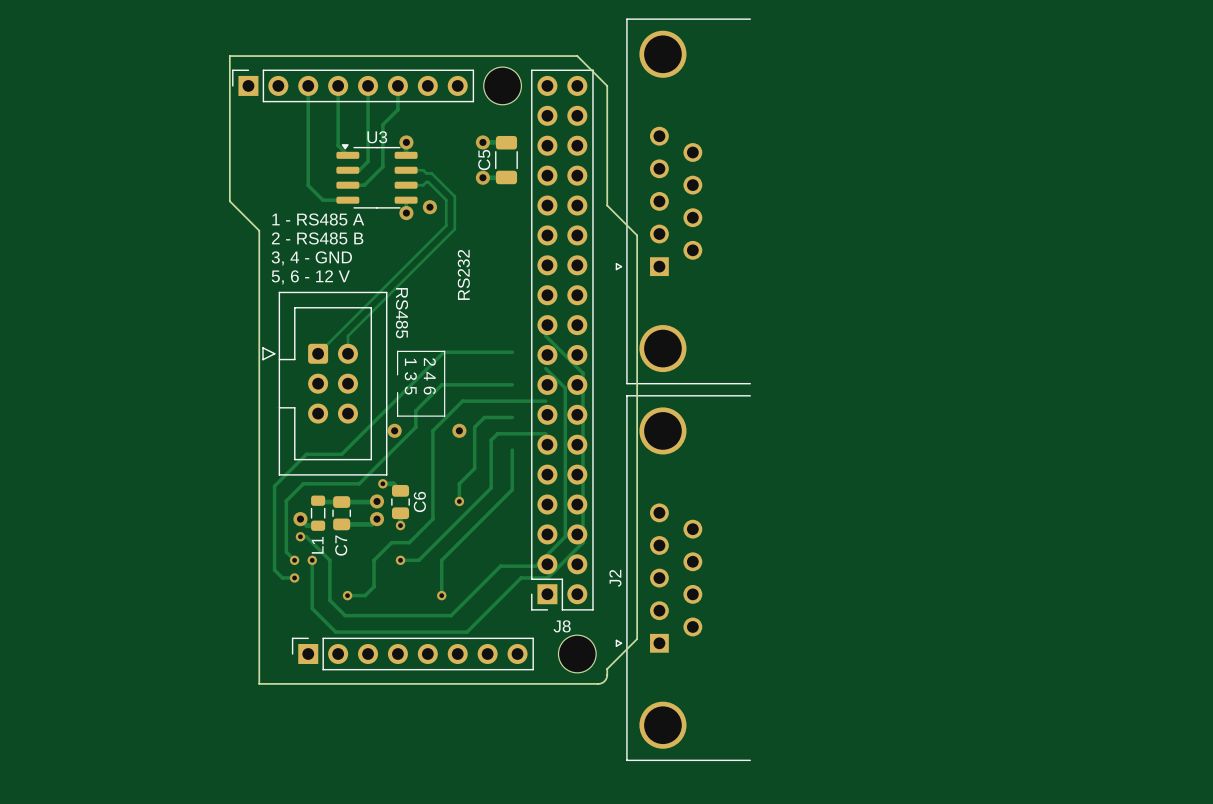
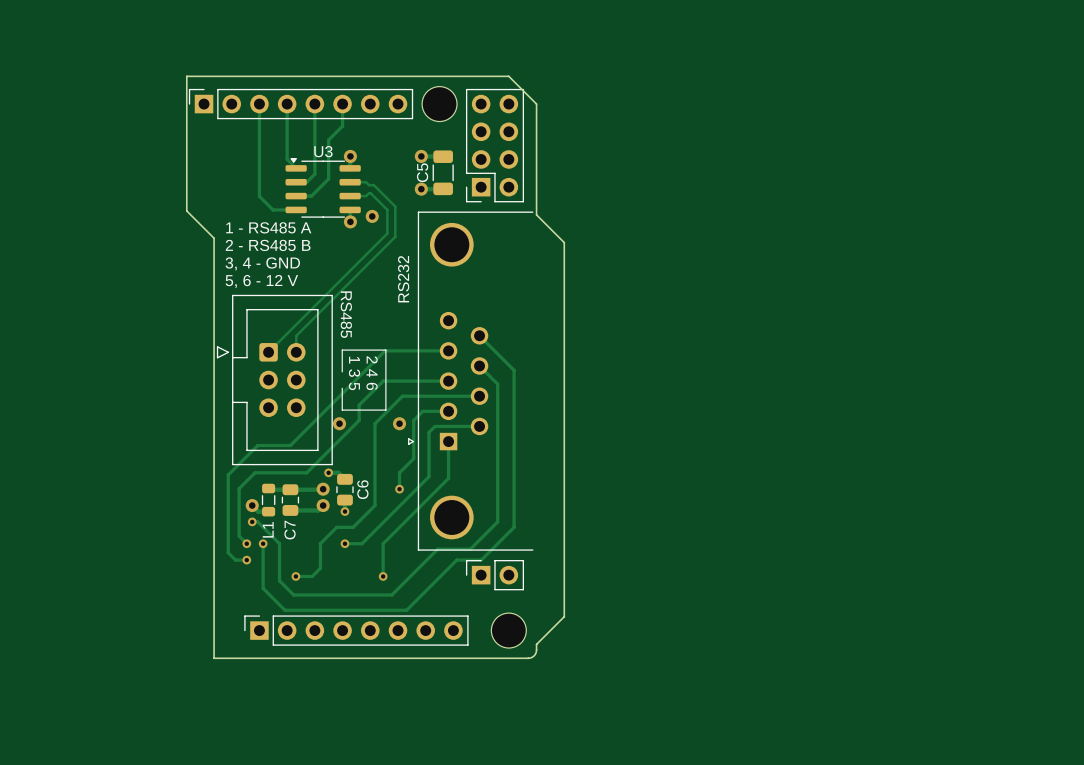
part: none -> (494, 145)
part position: (683, 201) -> (470, 381)
J8: (562, 340) -> none
J2: (683, 578) -> none
part: none -> (494, 575)

